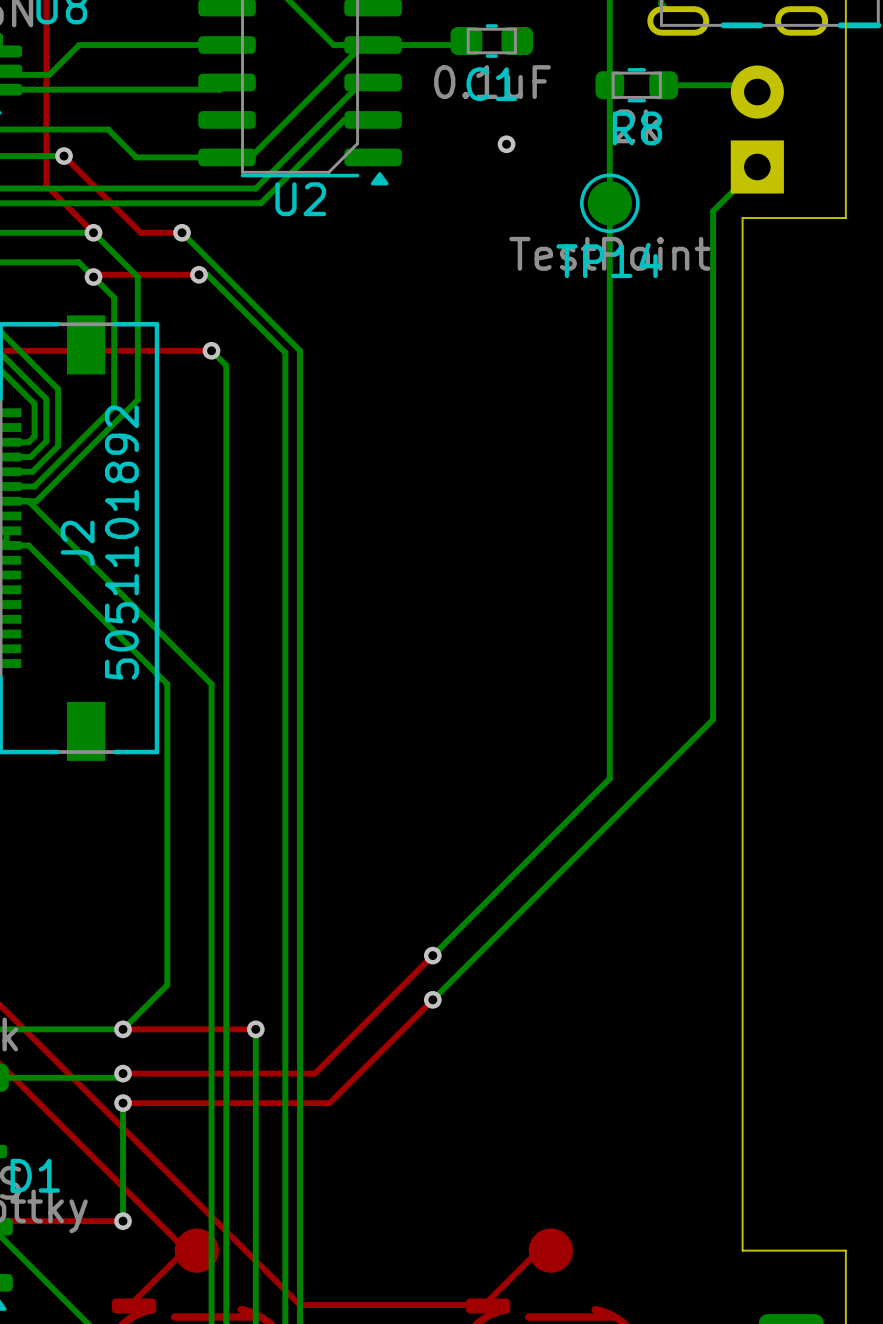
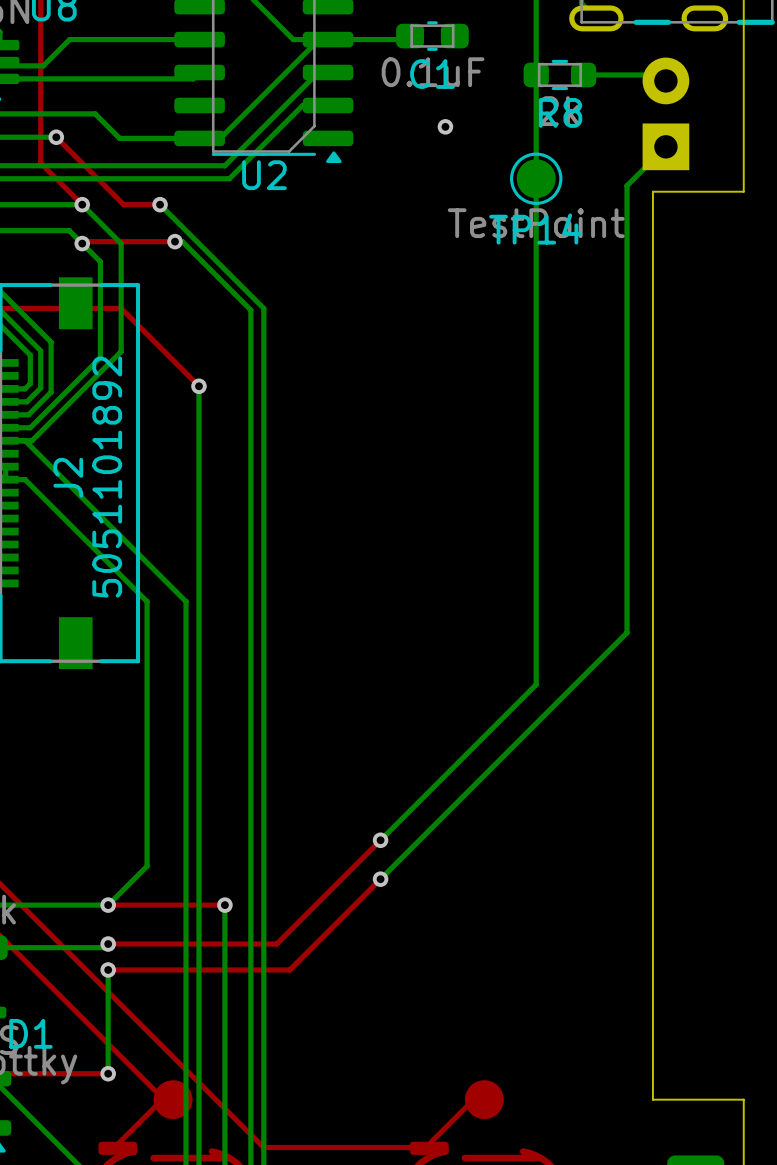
bottom track: (211, 350) (226, 365) (226, 439) -> none
top track: (211, 350) (137, 350) -> (198, 386) (121, 308)
via position: (211, 350) -> (198, 386)

